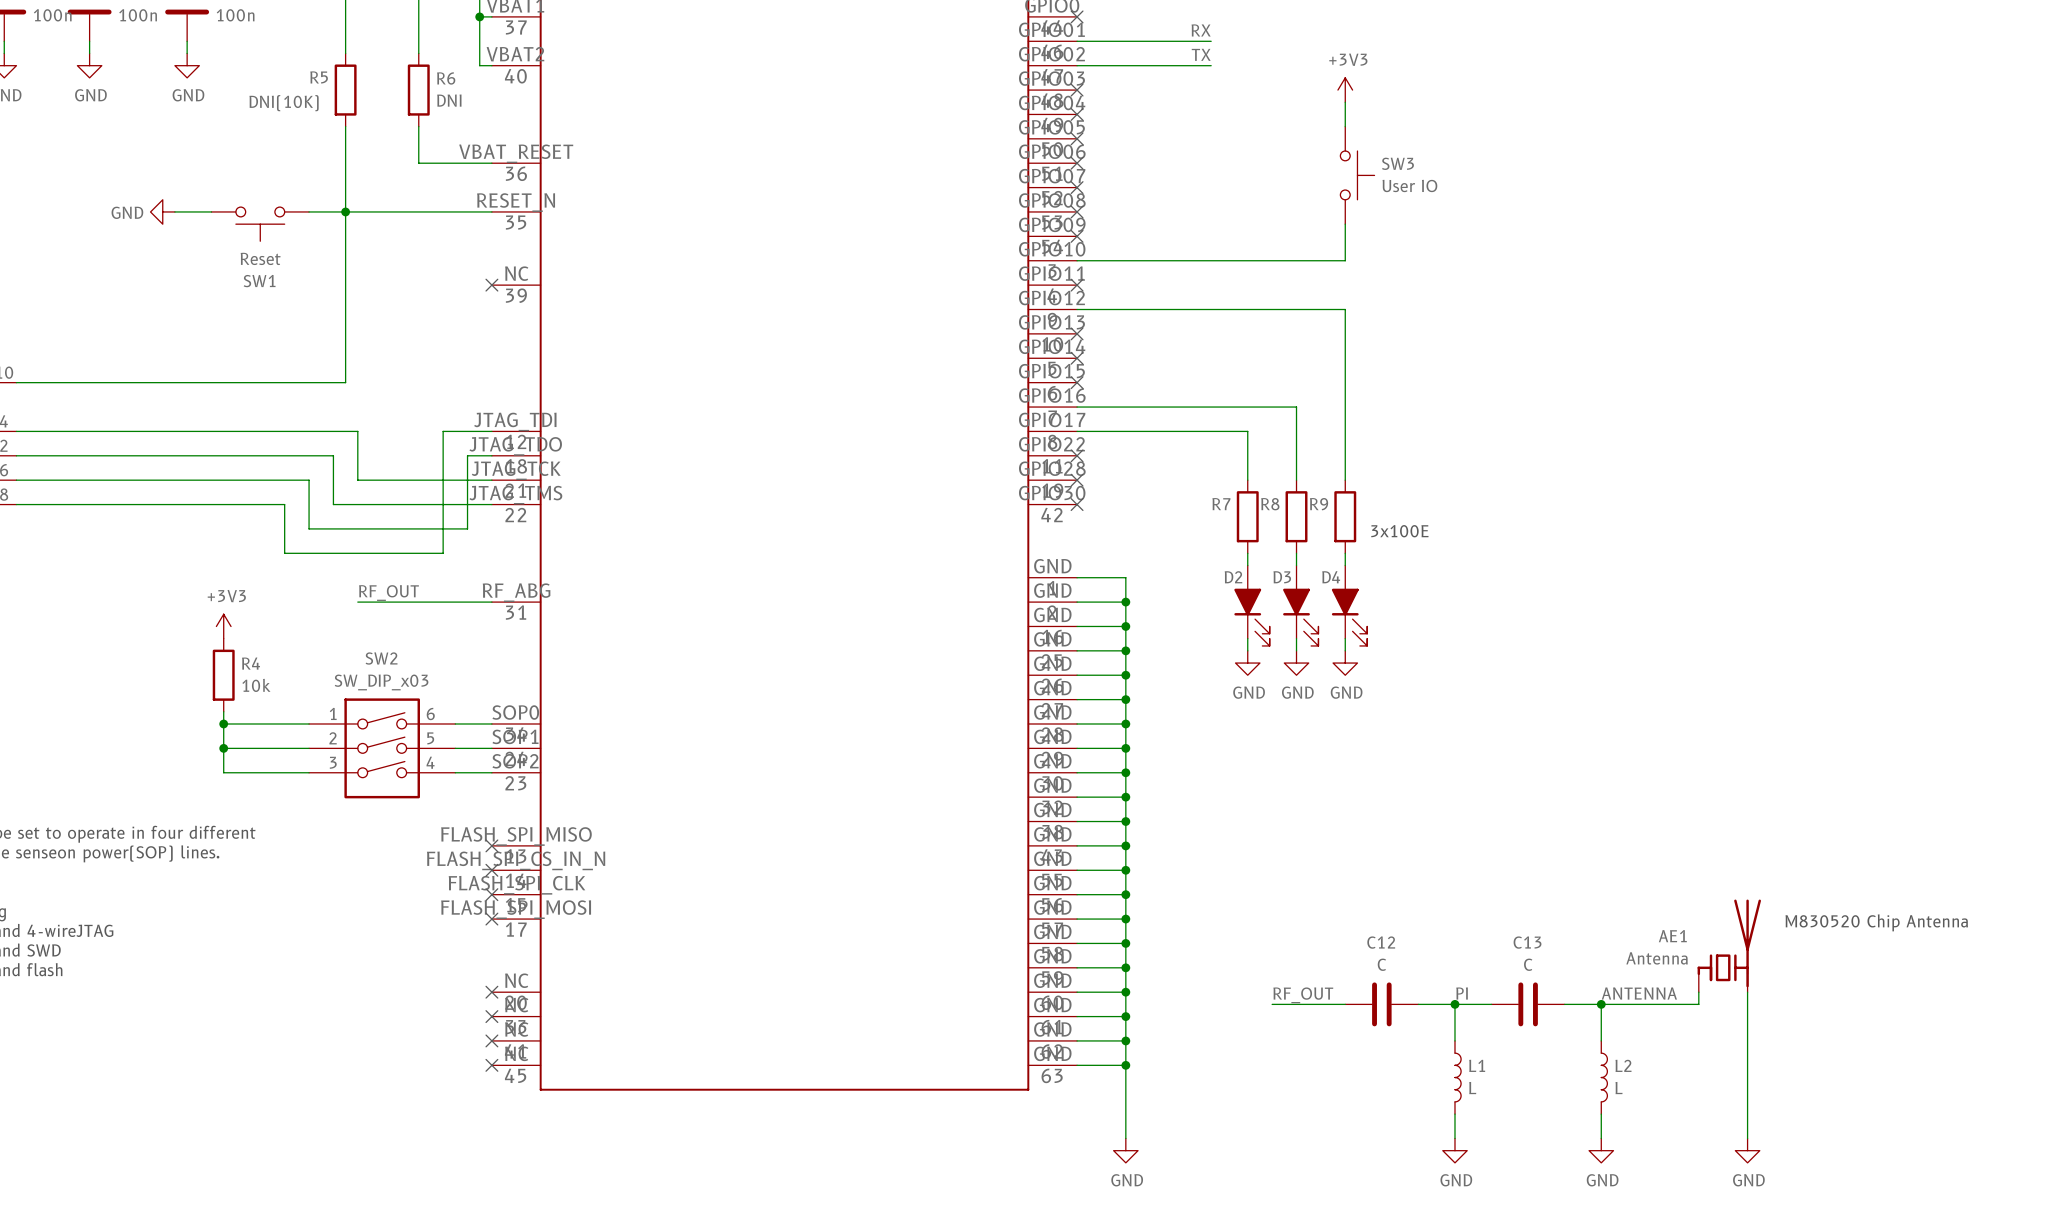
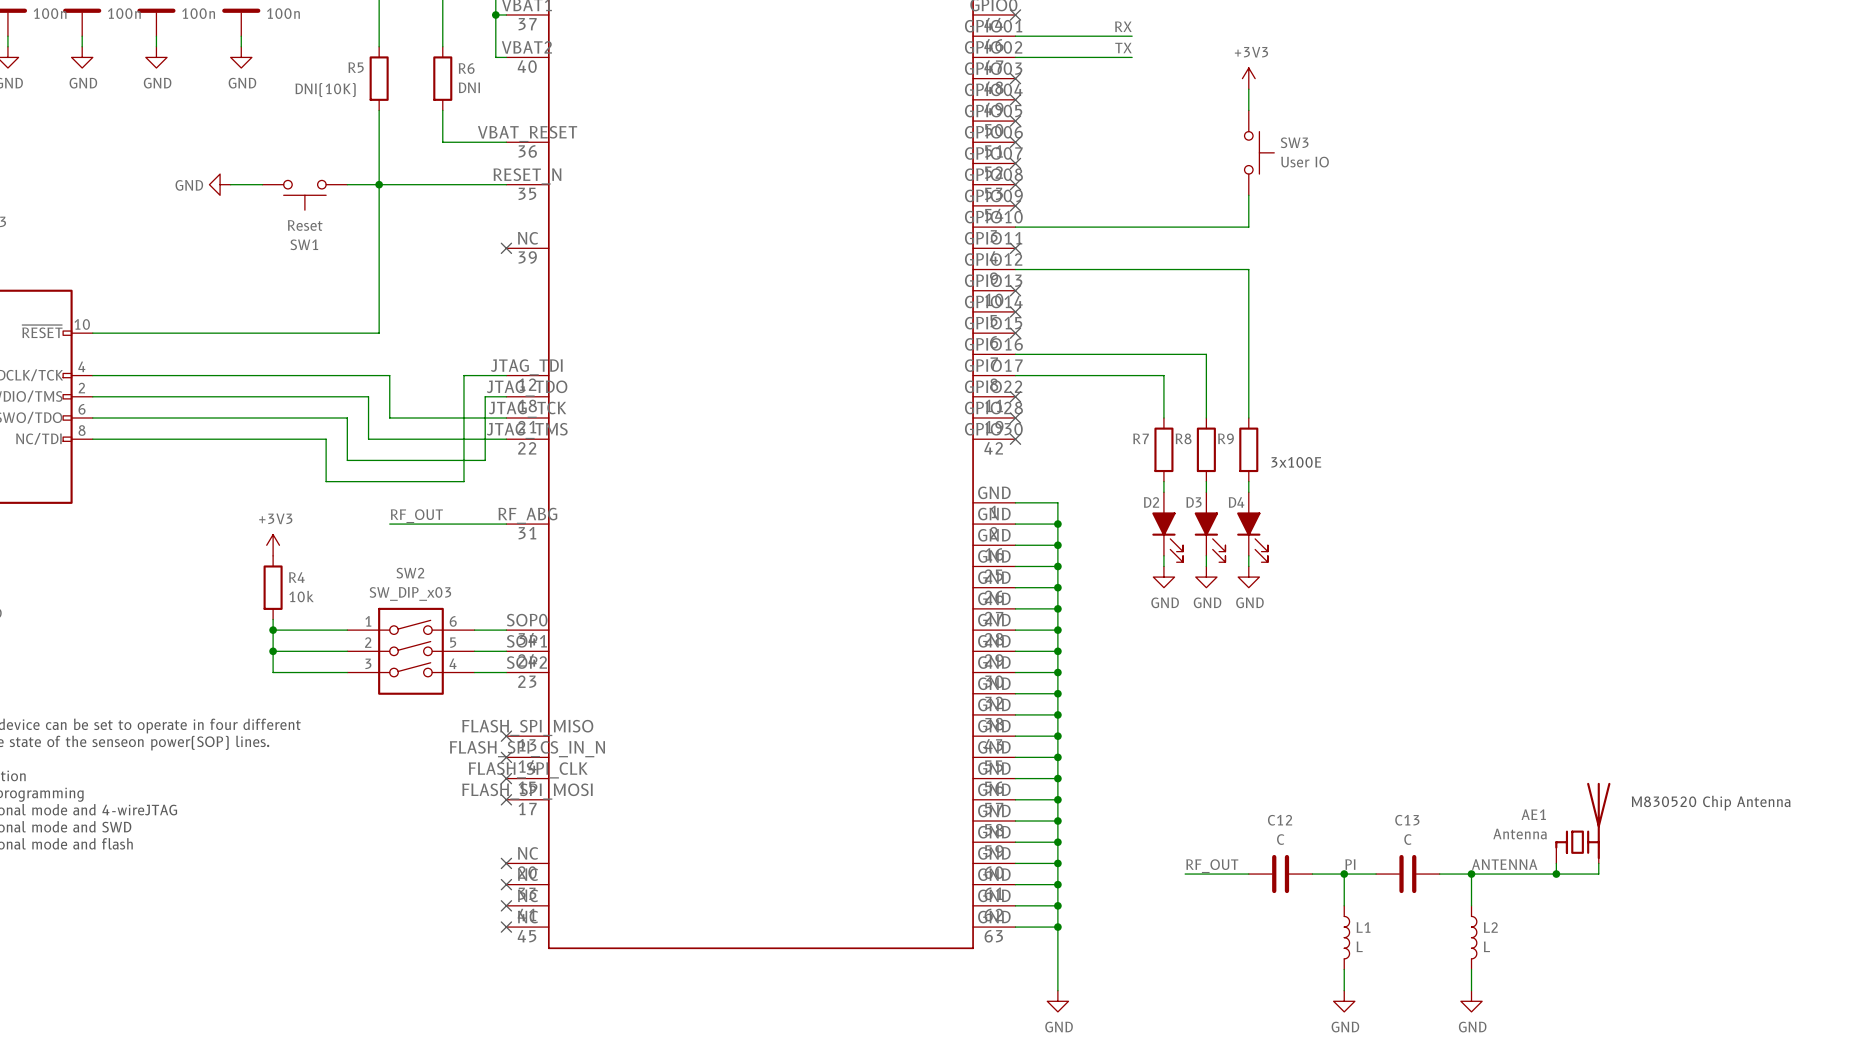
junction: none -> (1556, 874)
wire: (1747, 1004) (1747, 1138) -> (1598, 874) (1556, 874)
power symbol: GND (1747, 1150) -> none

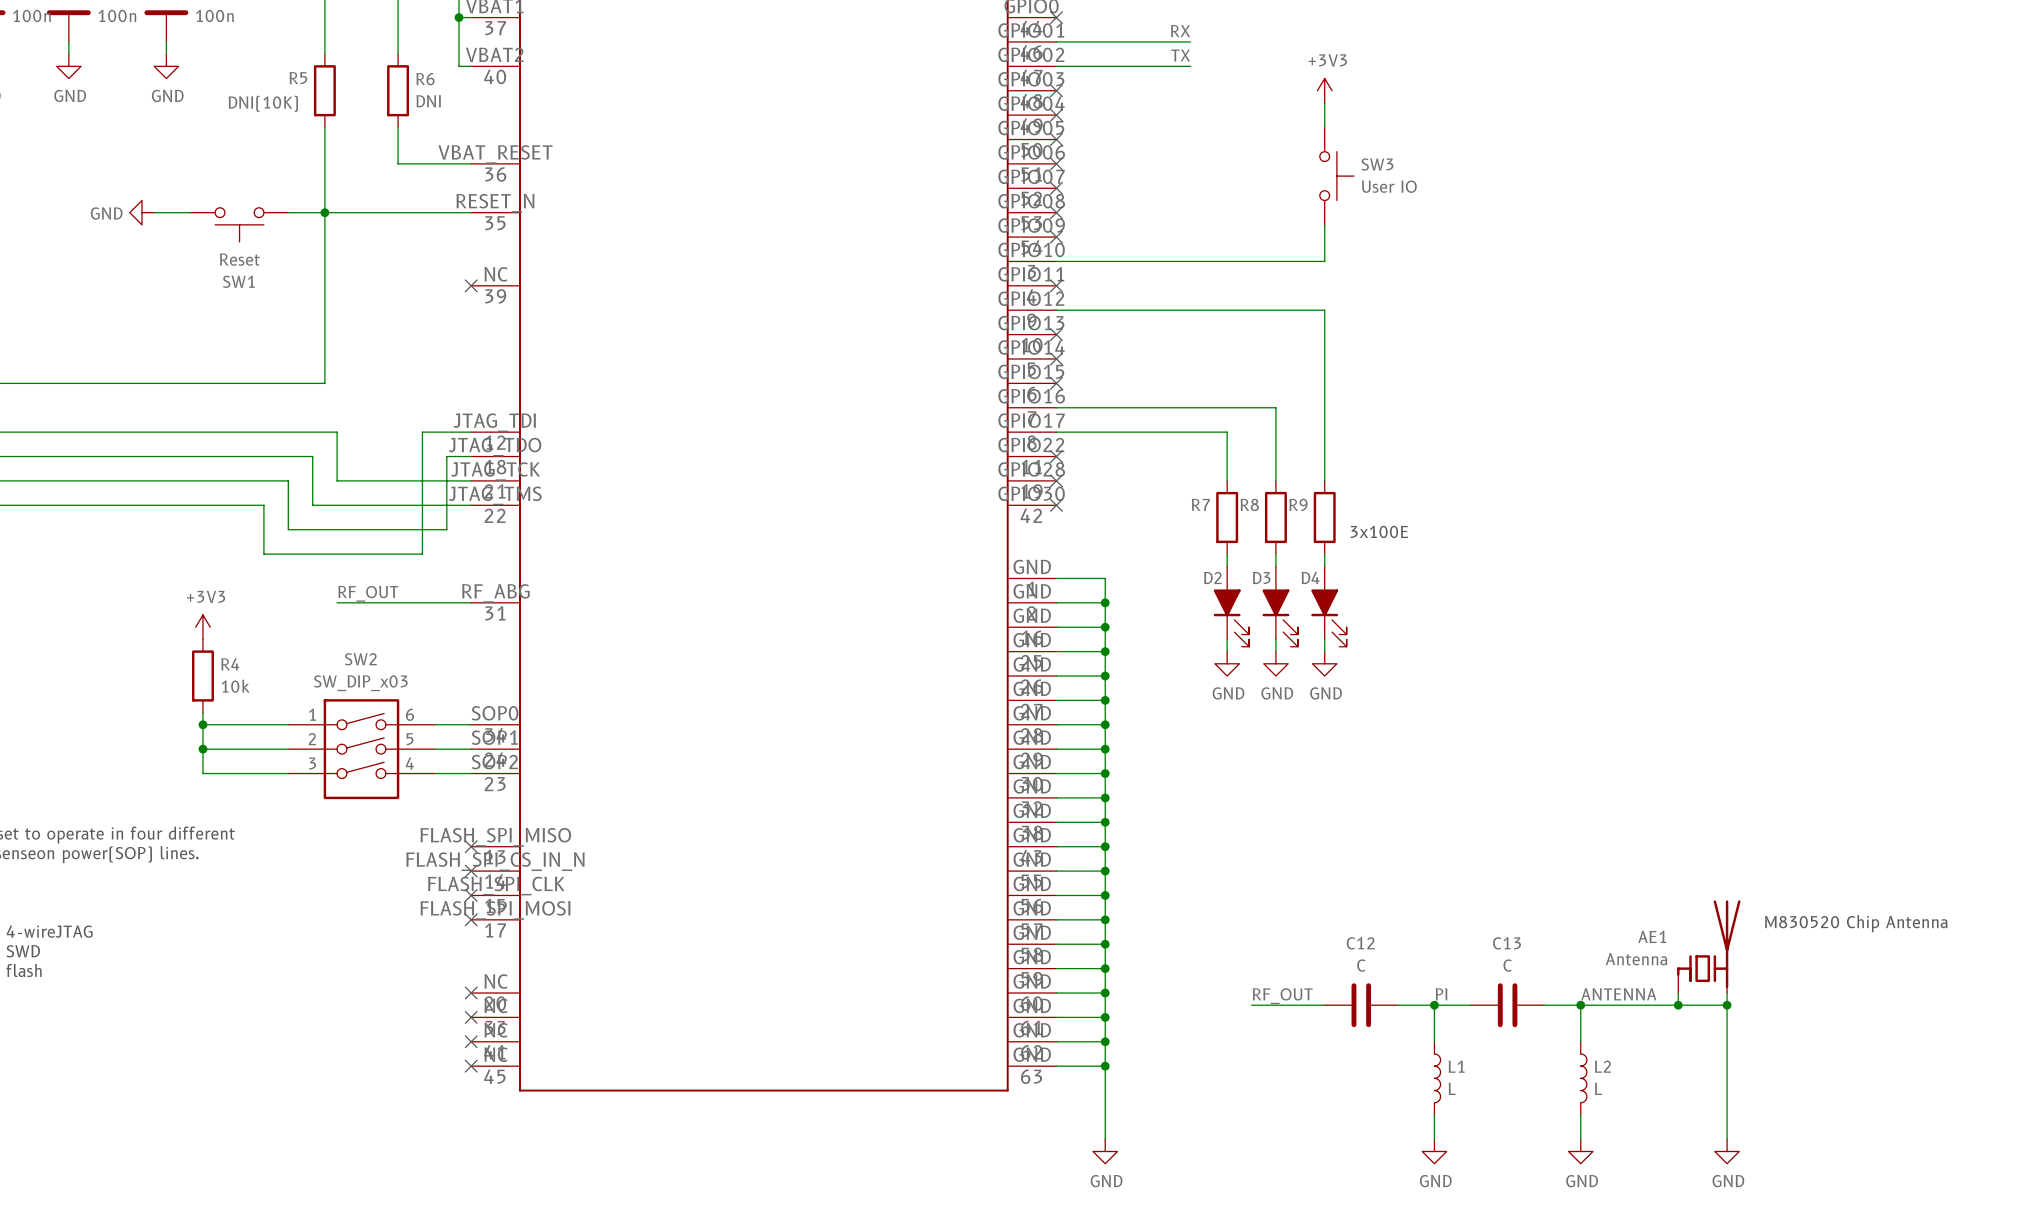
wire: none -> (1727, 1005) (1727, 1139)
junction: none -> (1727, 1005)
power symbol: none -> GND (1727, 1151)

